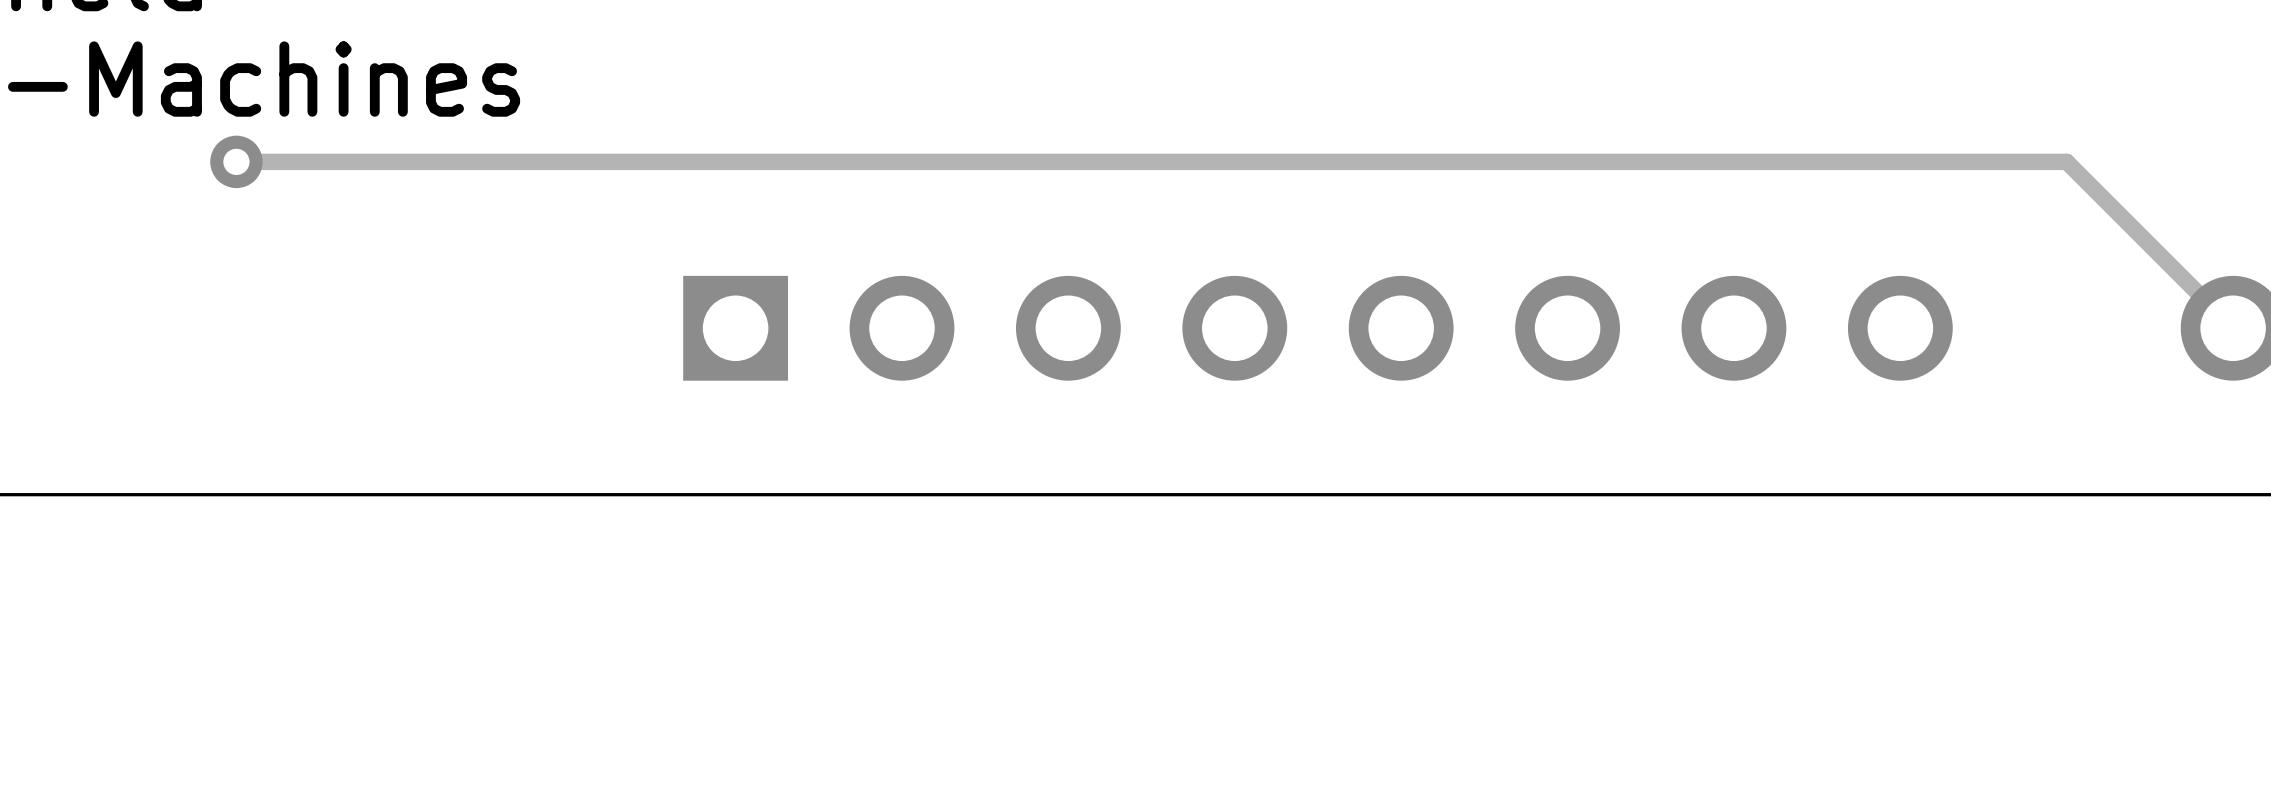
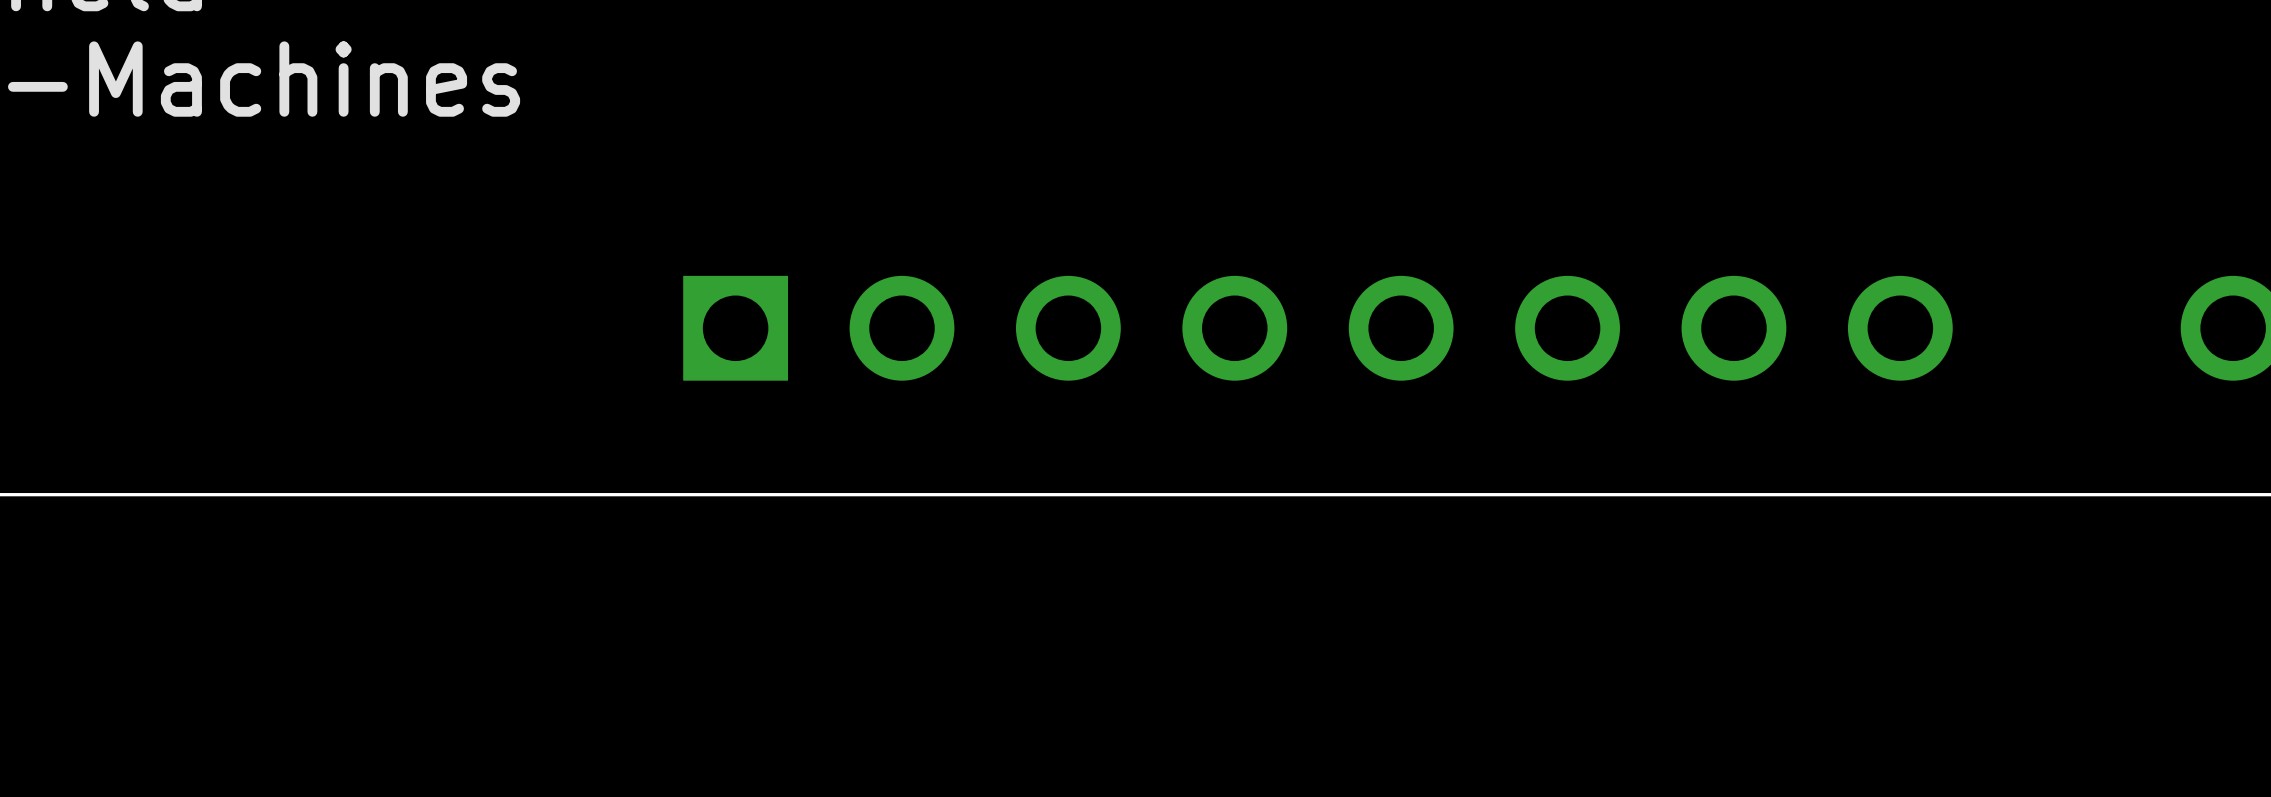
track: (236, 161) (2066, 161) (2233, 328) -> none
via: (236, 161) -> none

